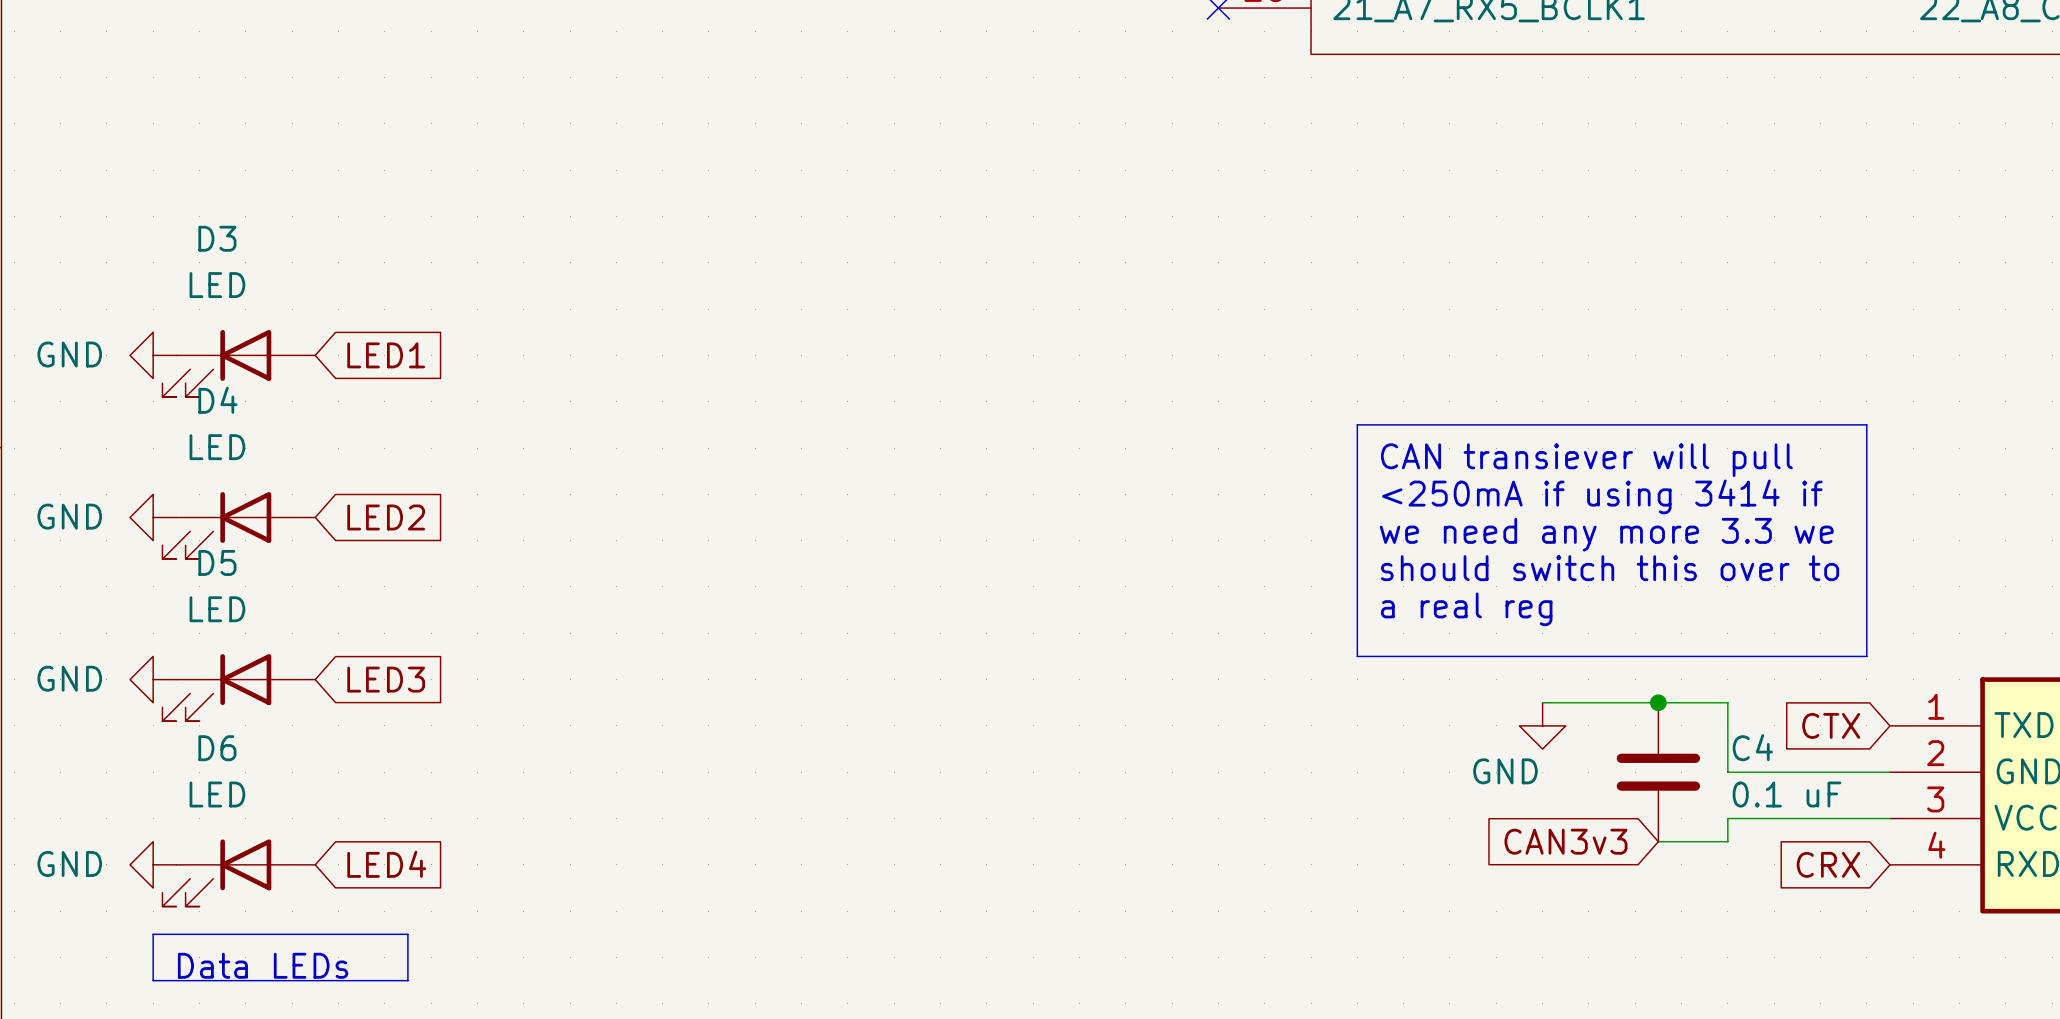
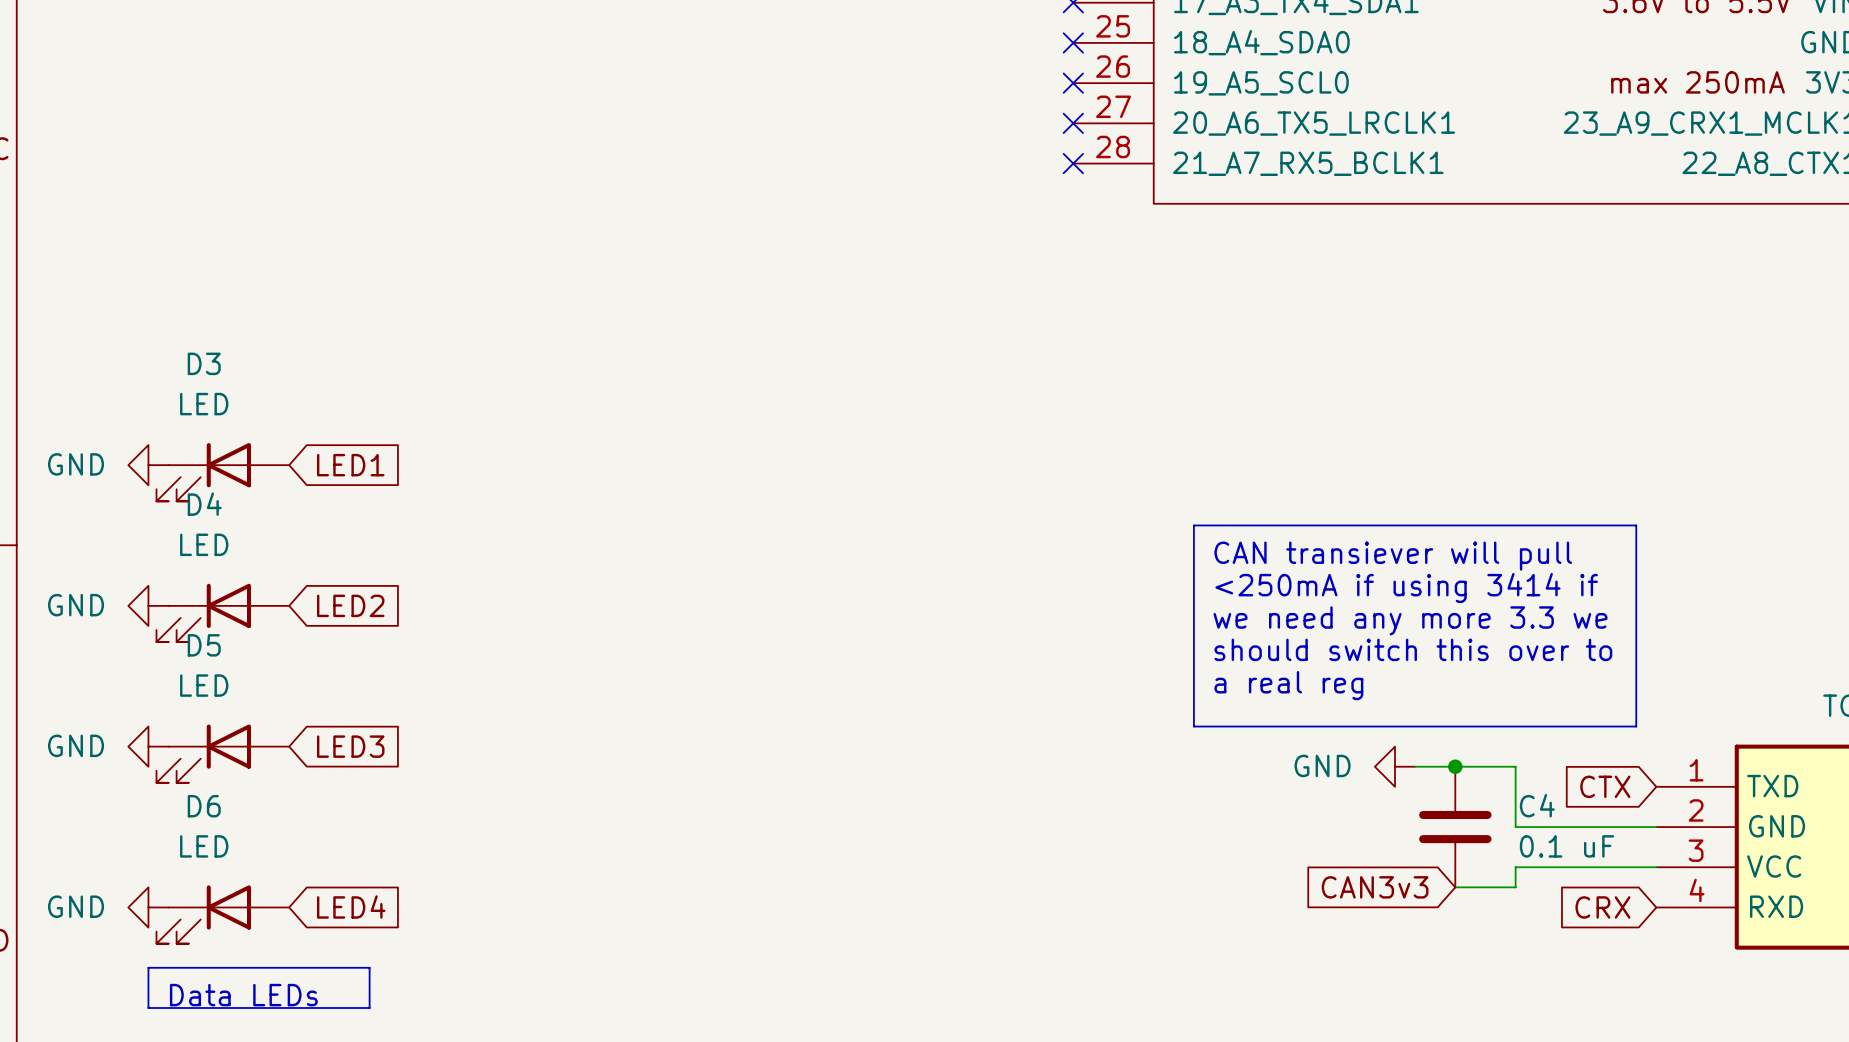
wire: (1542, 702) (1612, 702) -> none
power symbol rotation: 0° (1542, 725) -> 90° clockwise (1394, 766)
power symbol position: GND (1542, 725) -> GND (1394, 766)
power symbol text position: GND (1505, 771) -> GND (1322, 765)

